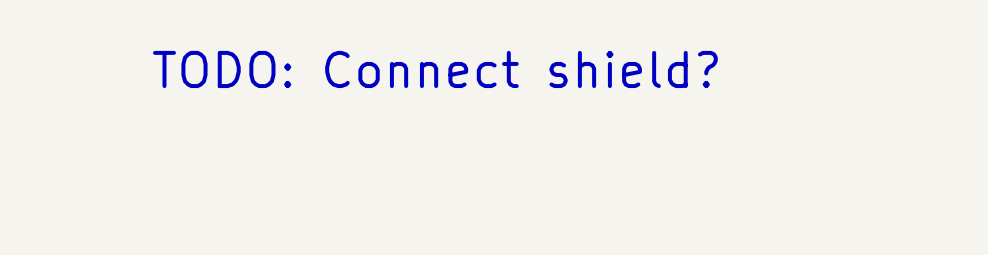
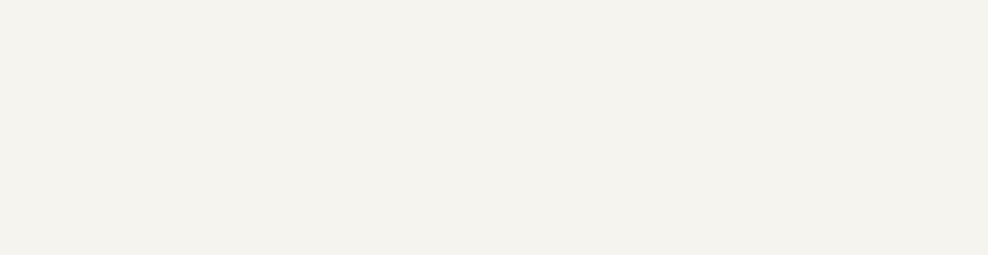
text: TODO: Connect shield? (435, 69) -> none

